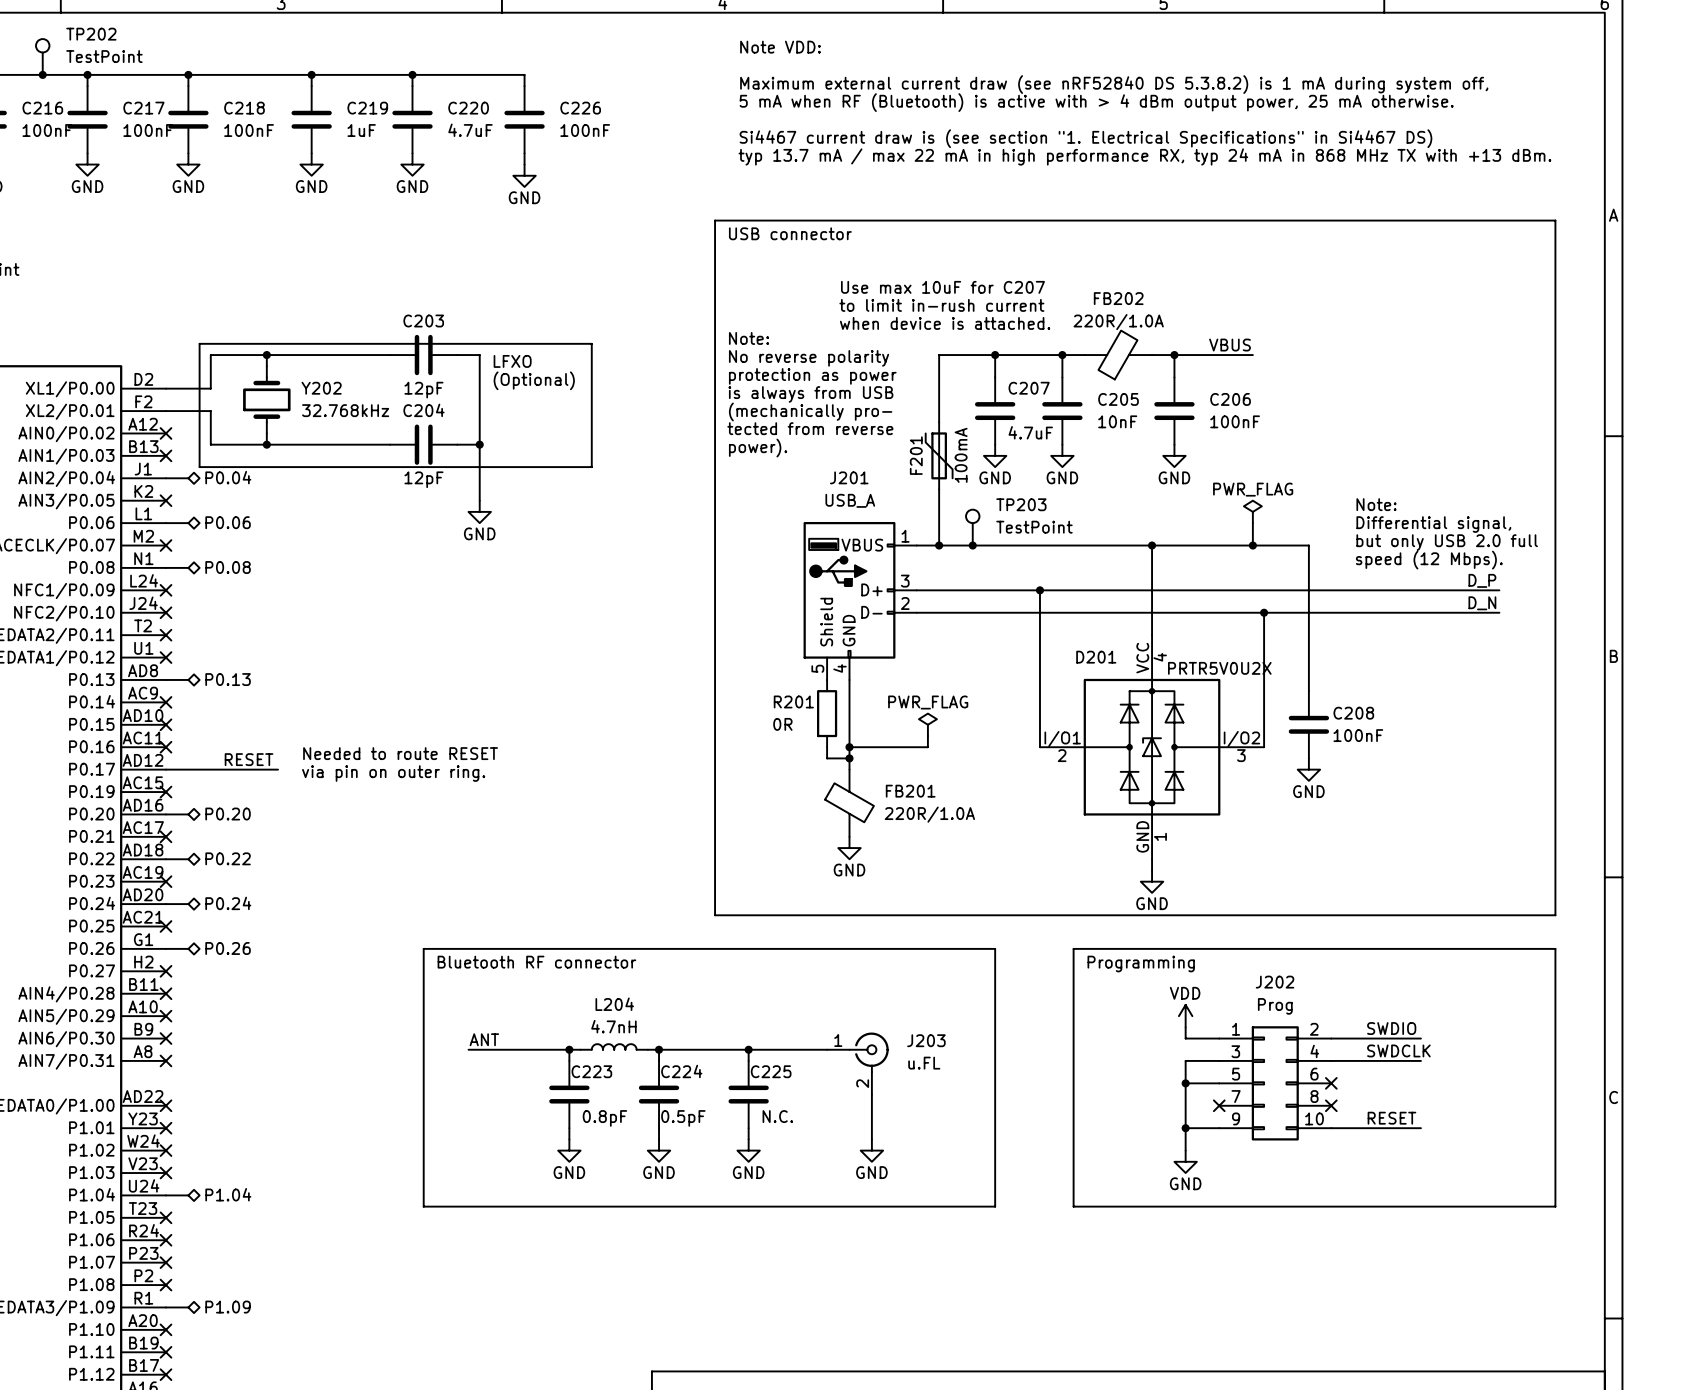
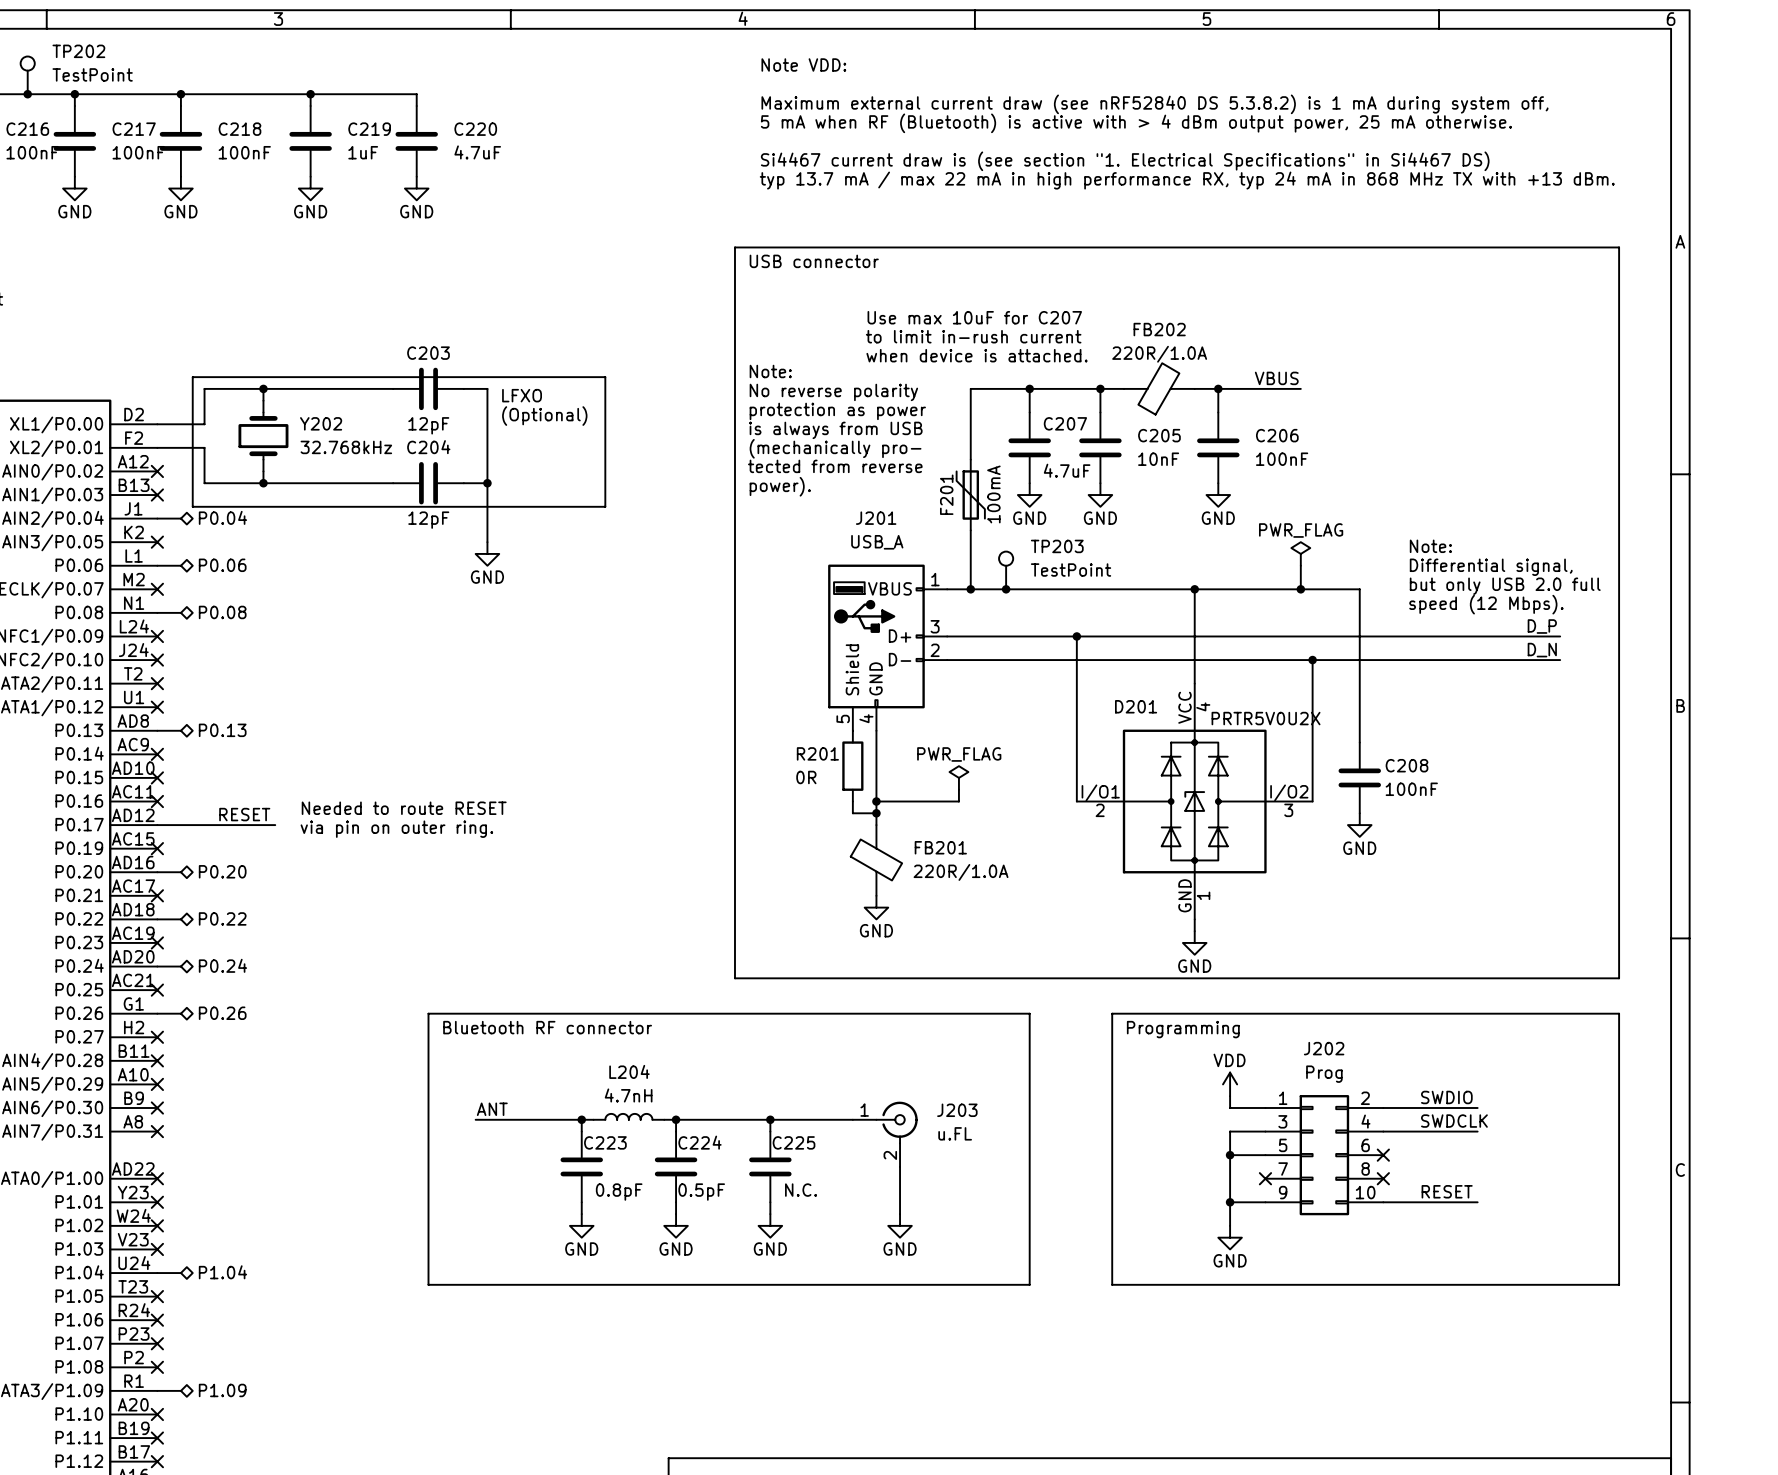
wire: (412, 74) (524, 74) (524, 86) -> none
junction: (412, 74) -> none
C226: 100nF (524, 119) -> none
wire: (524, 153) (524, 164) -> none
power symbol: GND (524, 175) -> none

